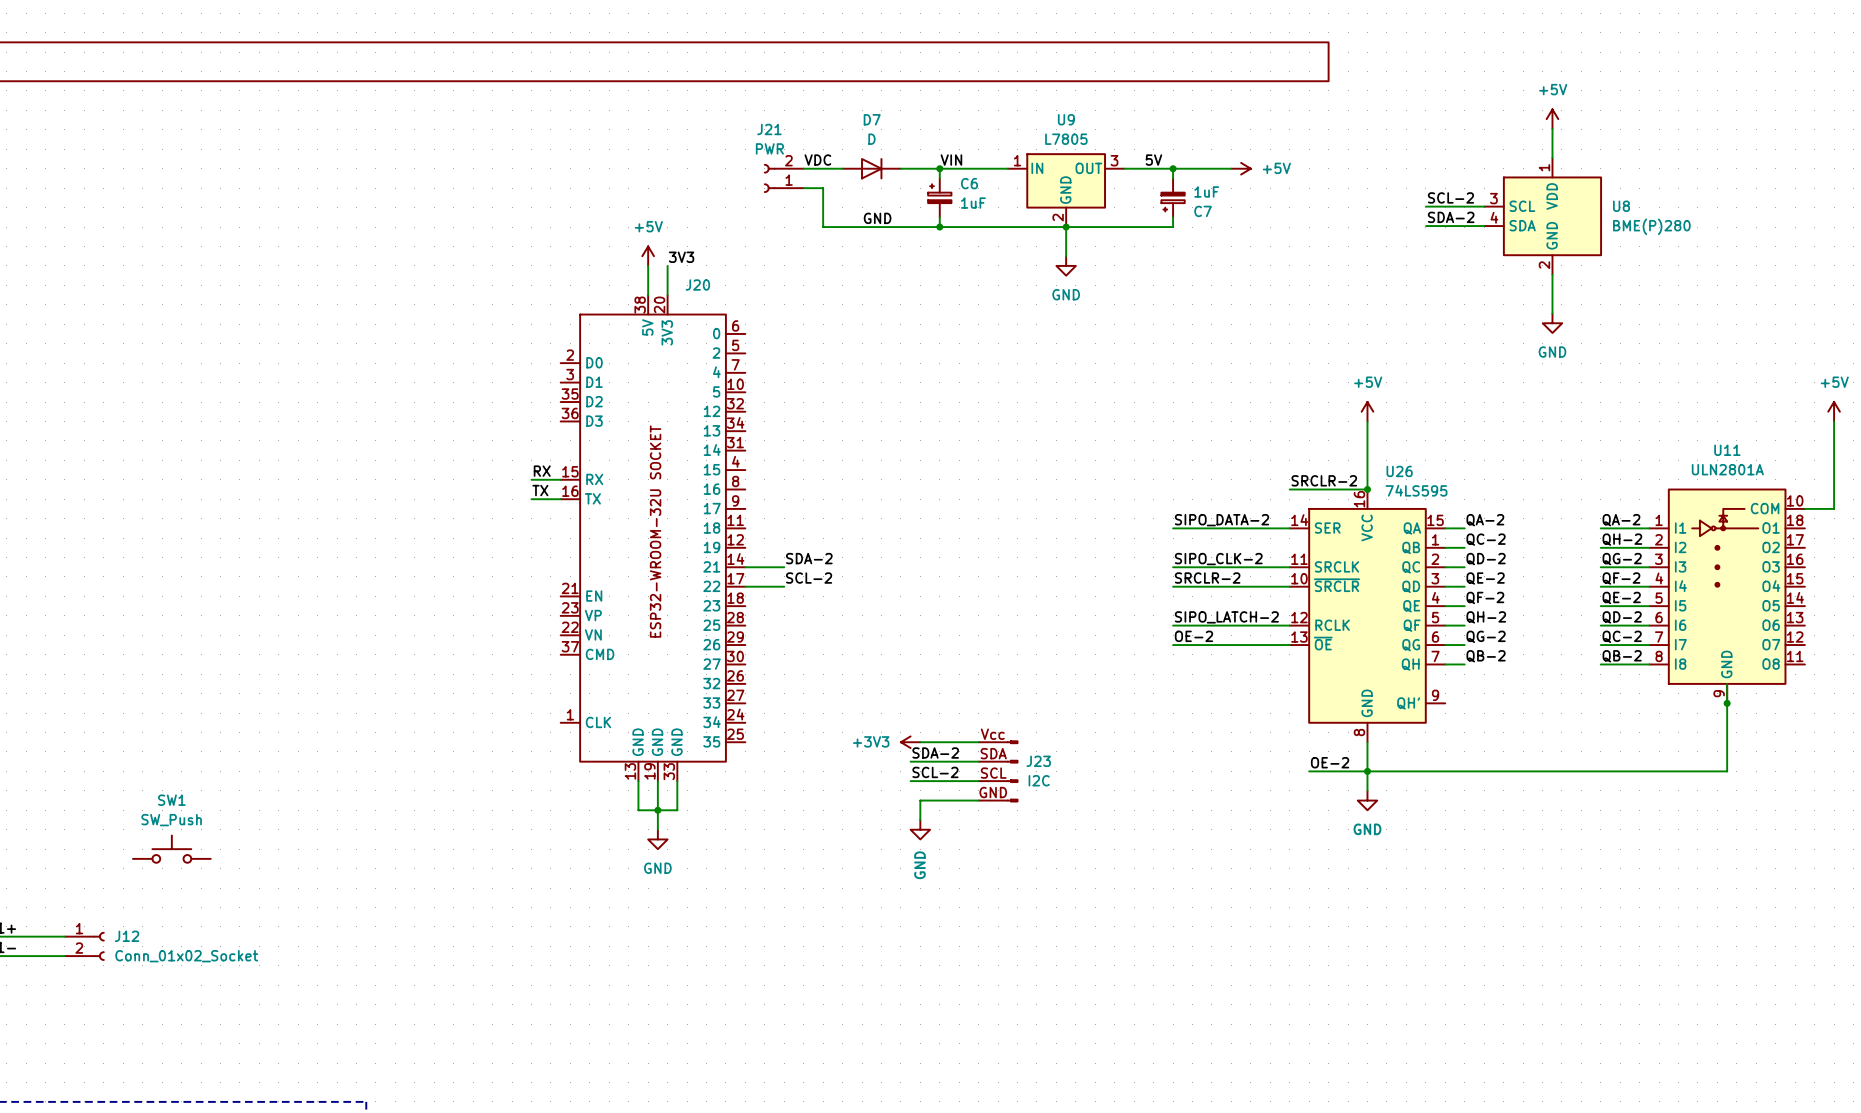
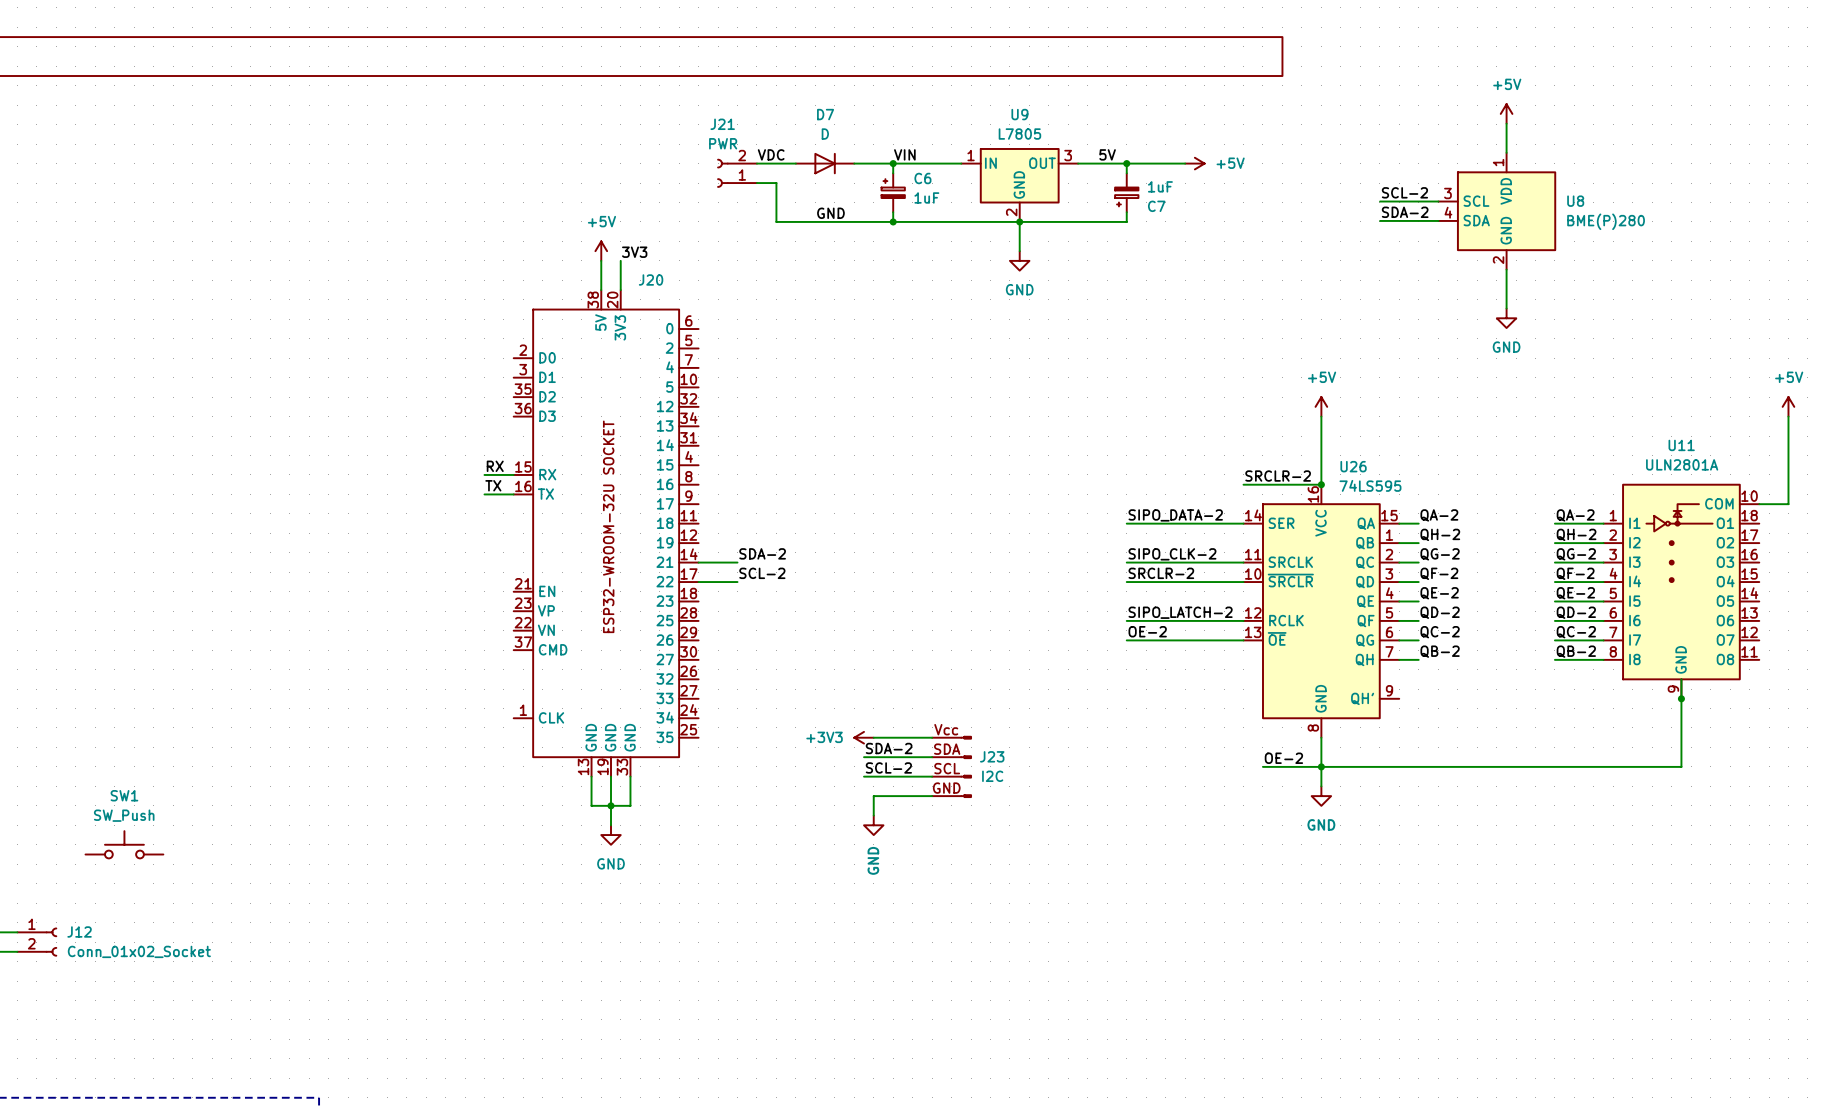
label: QC-2 (1486, 539) -> QH-2 (1440, 534)
label: QD-2 (1486, 559) -> QG-2 (1440, 554)
label: QE-2 (1485, 578) -> QF-2 (1439, 573)
label: QF-2 (1485, 597) -> QE-2 (1439, 593)
label: QH-2 (1486, 617) -> QD-2 (1440, 612)
label: QG-2 (1486, 636) -> QC-2 (1440, 632)

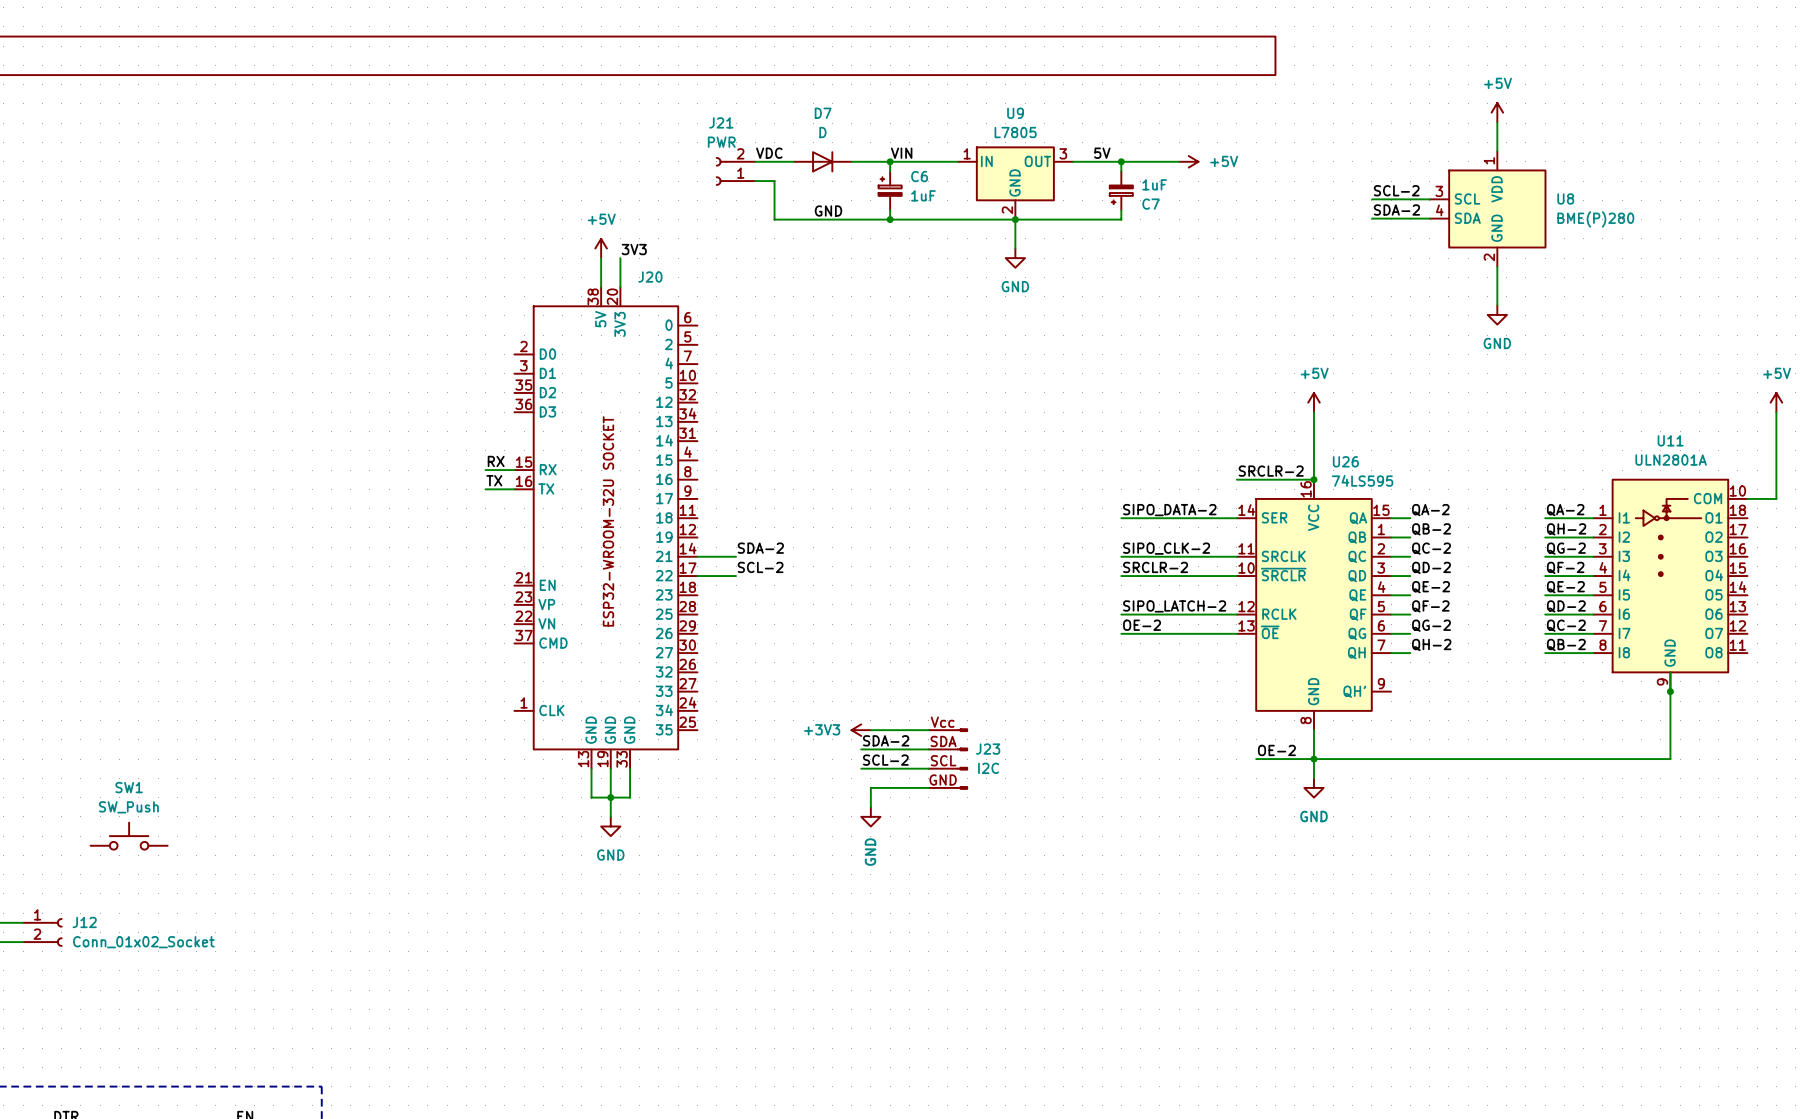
label: QH-2 (1440, 534) -> QB-2 (1431, 529)
label: QG-2 (1440, 554) -> QC-2 (1431, 548)
label: QF-2 (1439, 573) -> QD-2 (1431, 567)
label: QD-2 (1440, 612) -> QF-2 (1430, 606)
label: QC-2 (1440, 632) -> QG-2 (1431, 625)
label: QB-2 (1440, 651) -> QH-2 (1431, 644)

